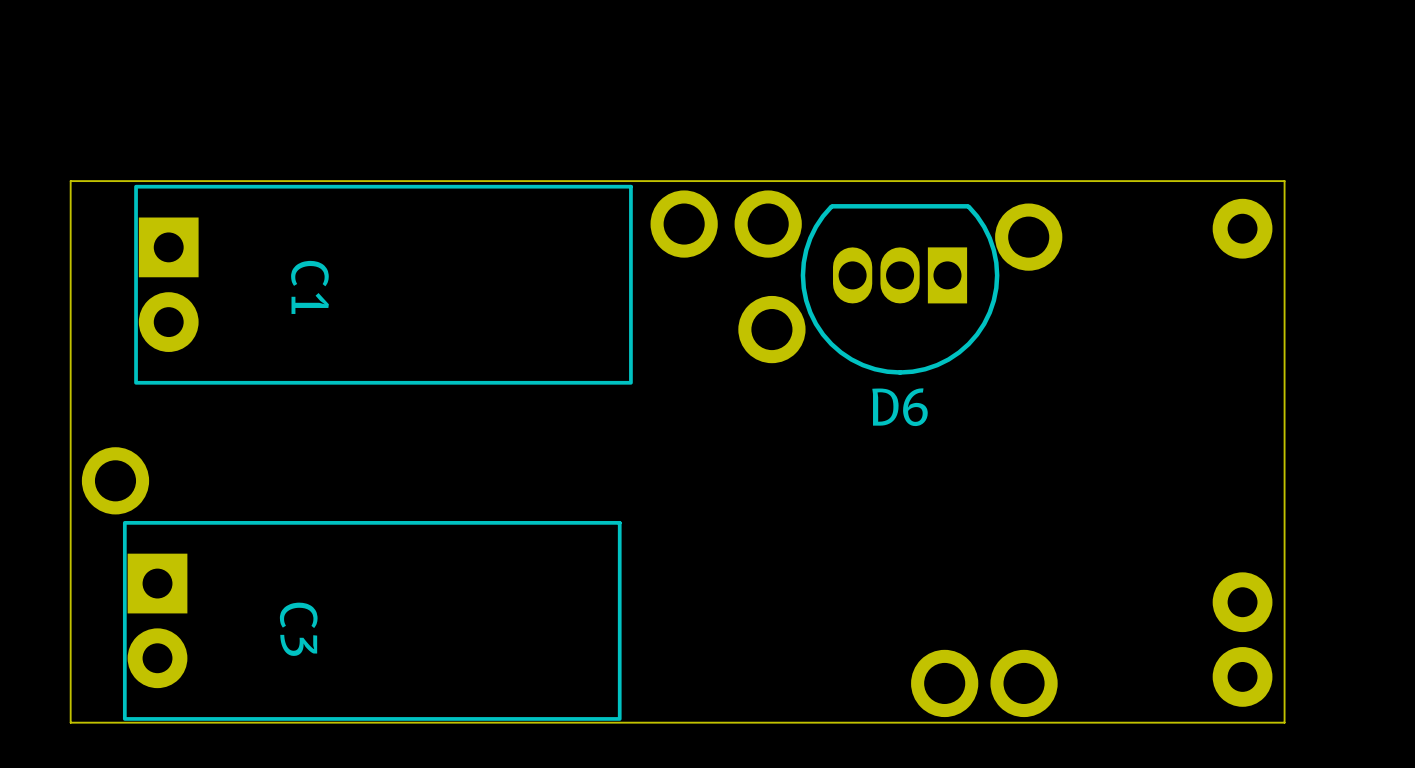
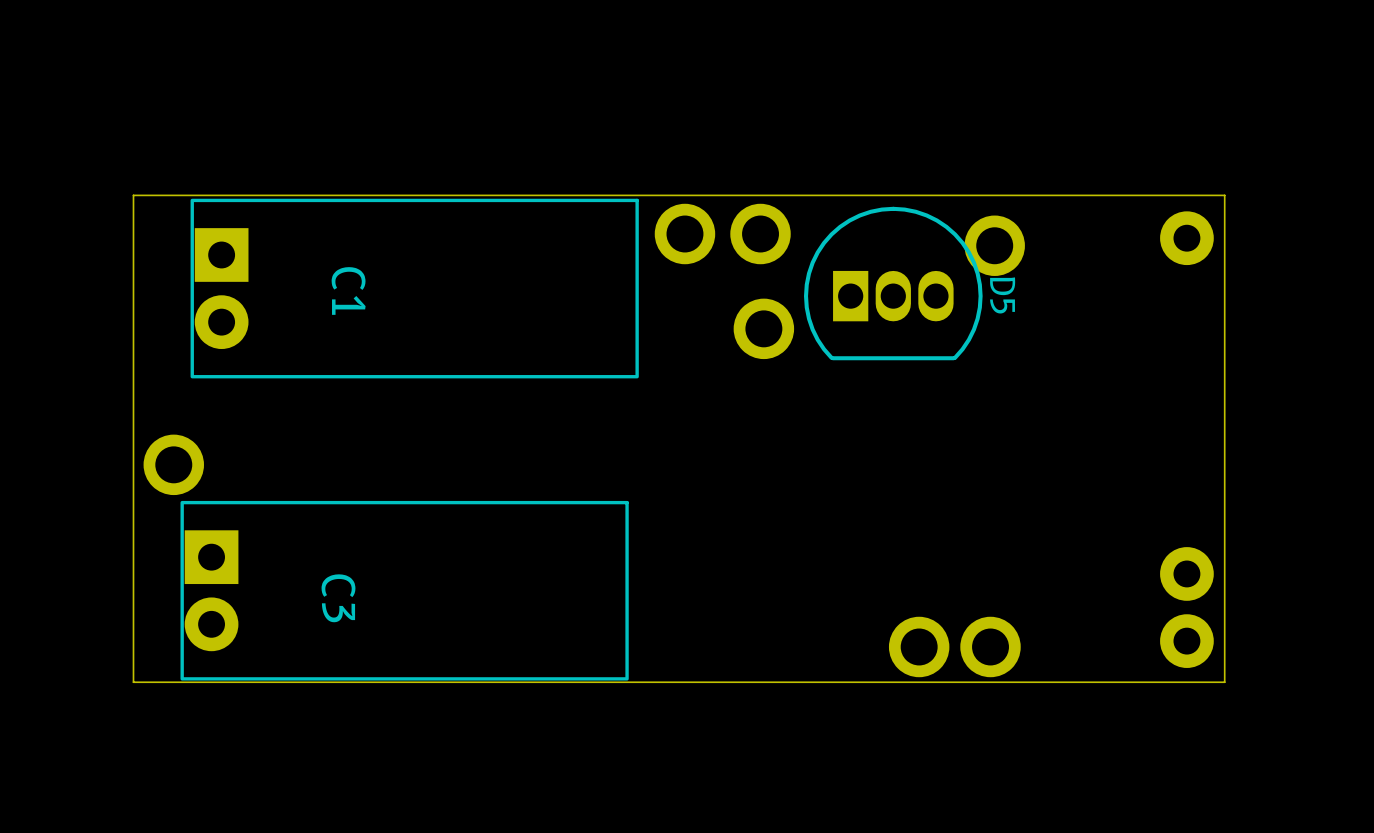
D5: none -> (893, 283)
D6: (900, 289) -> none

